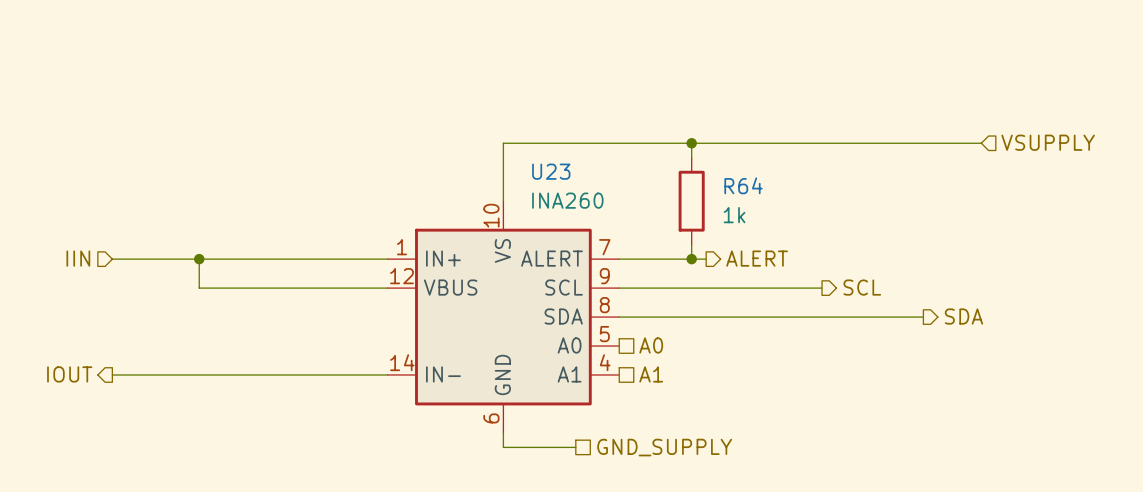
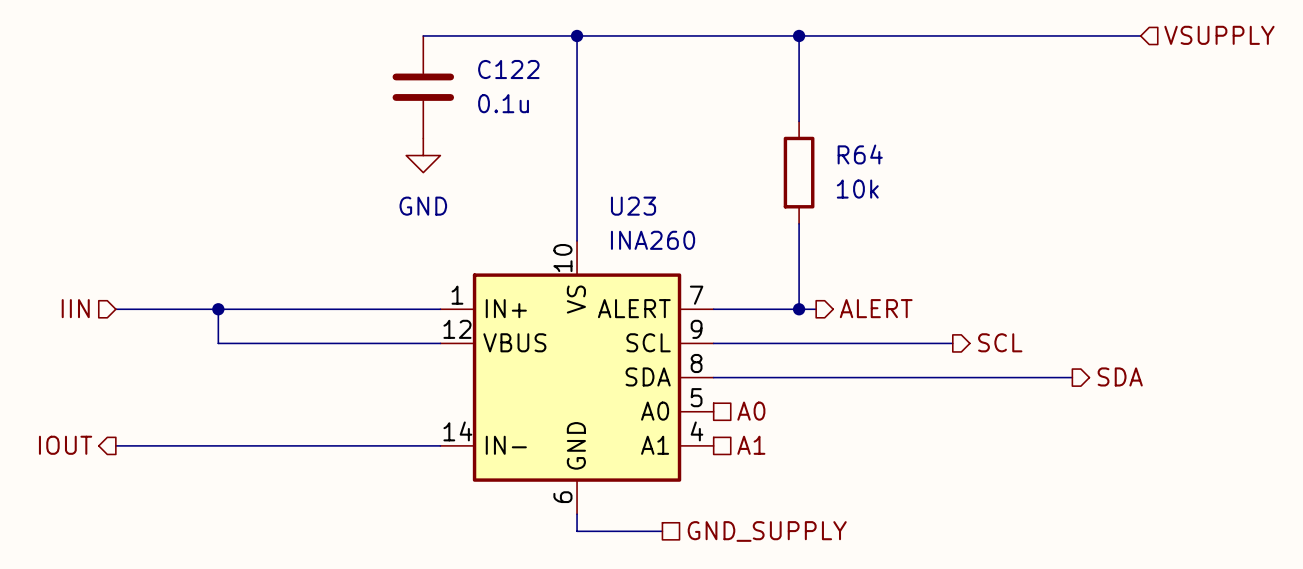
wire: none -> (423, 35) (1140, 35)
junction: none -> (577, 35)
wire: none -> (799, 35) (799, 121)
junction: none -> (799, 35)
C122: none -> 0.1u (423, 87)
power symbol: none -> GND (423, 155)
hierarchical label position: VSUPPLY (1048, 142) -> VSUPPLY (1219, 35)
wire: (503, 143) (981, 143) -> (577, 172) (577, 35)
wire: (691, 143) (691, 157) -> none
junction: (691, 143) -> none
wire: none -> (799, 223) (799, 292)
R64 position: (691, 201) -> (799, 172)
R64 value: 1k (734, 215) -> 10k (857, 189)

